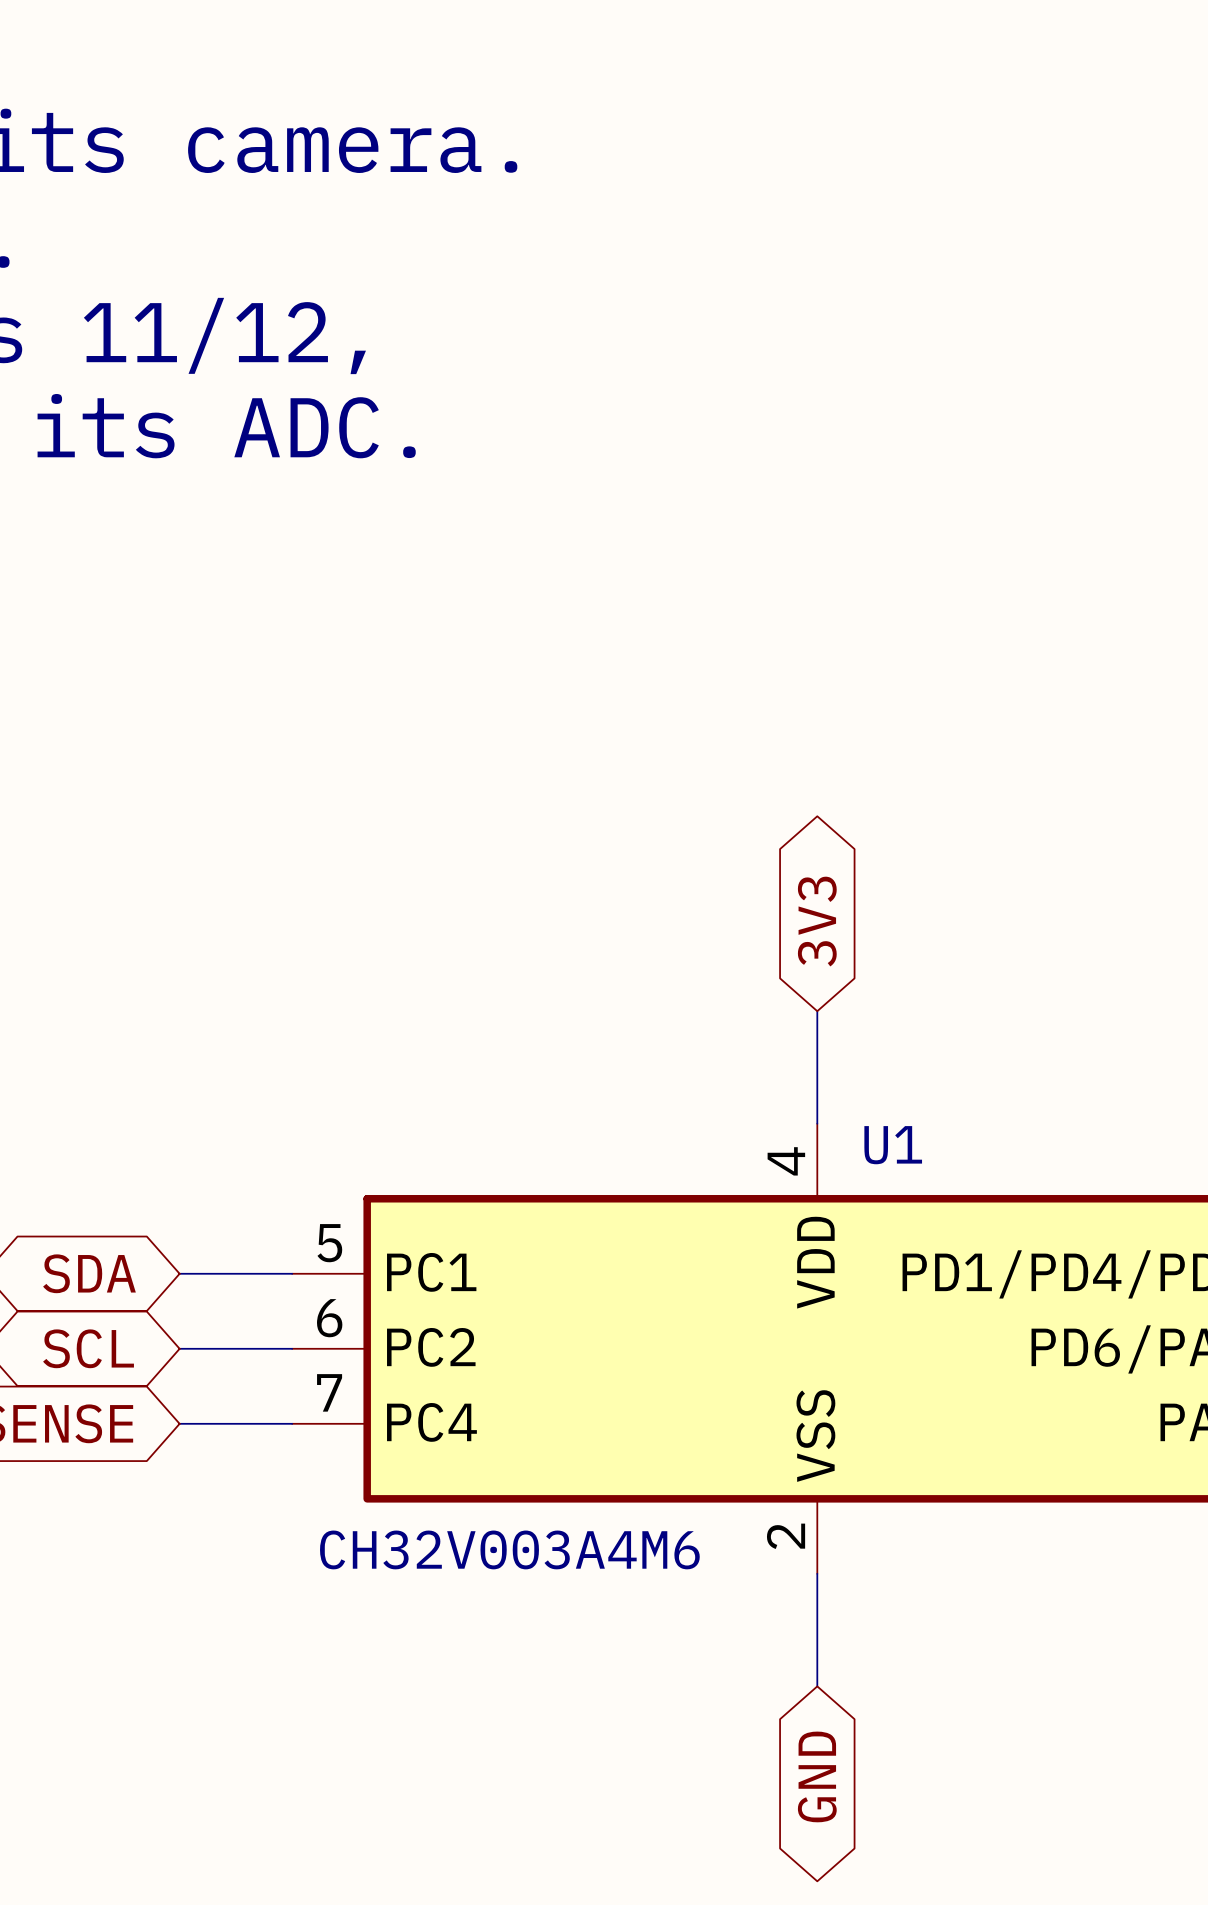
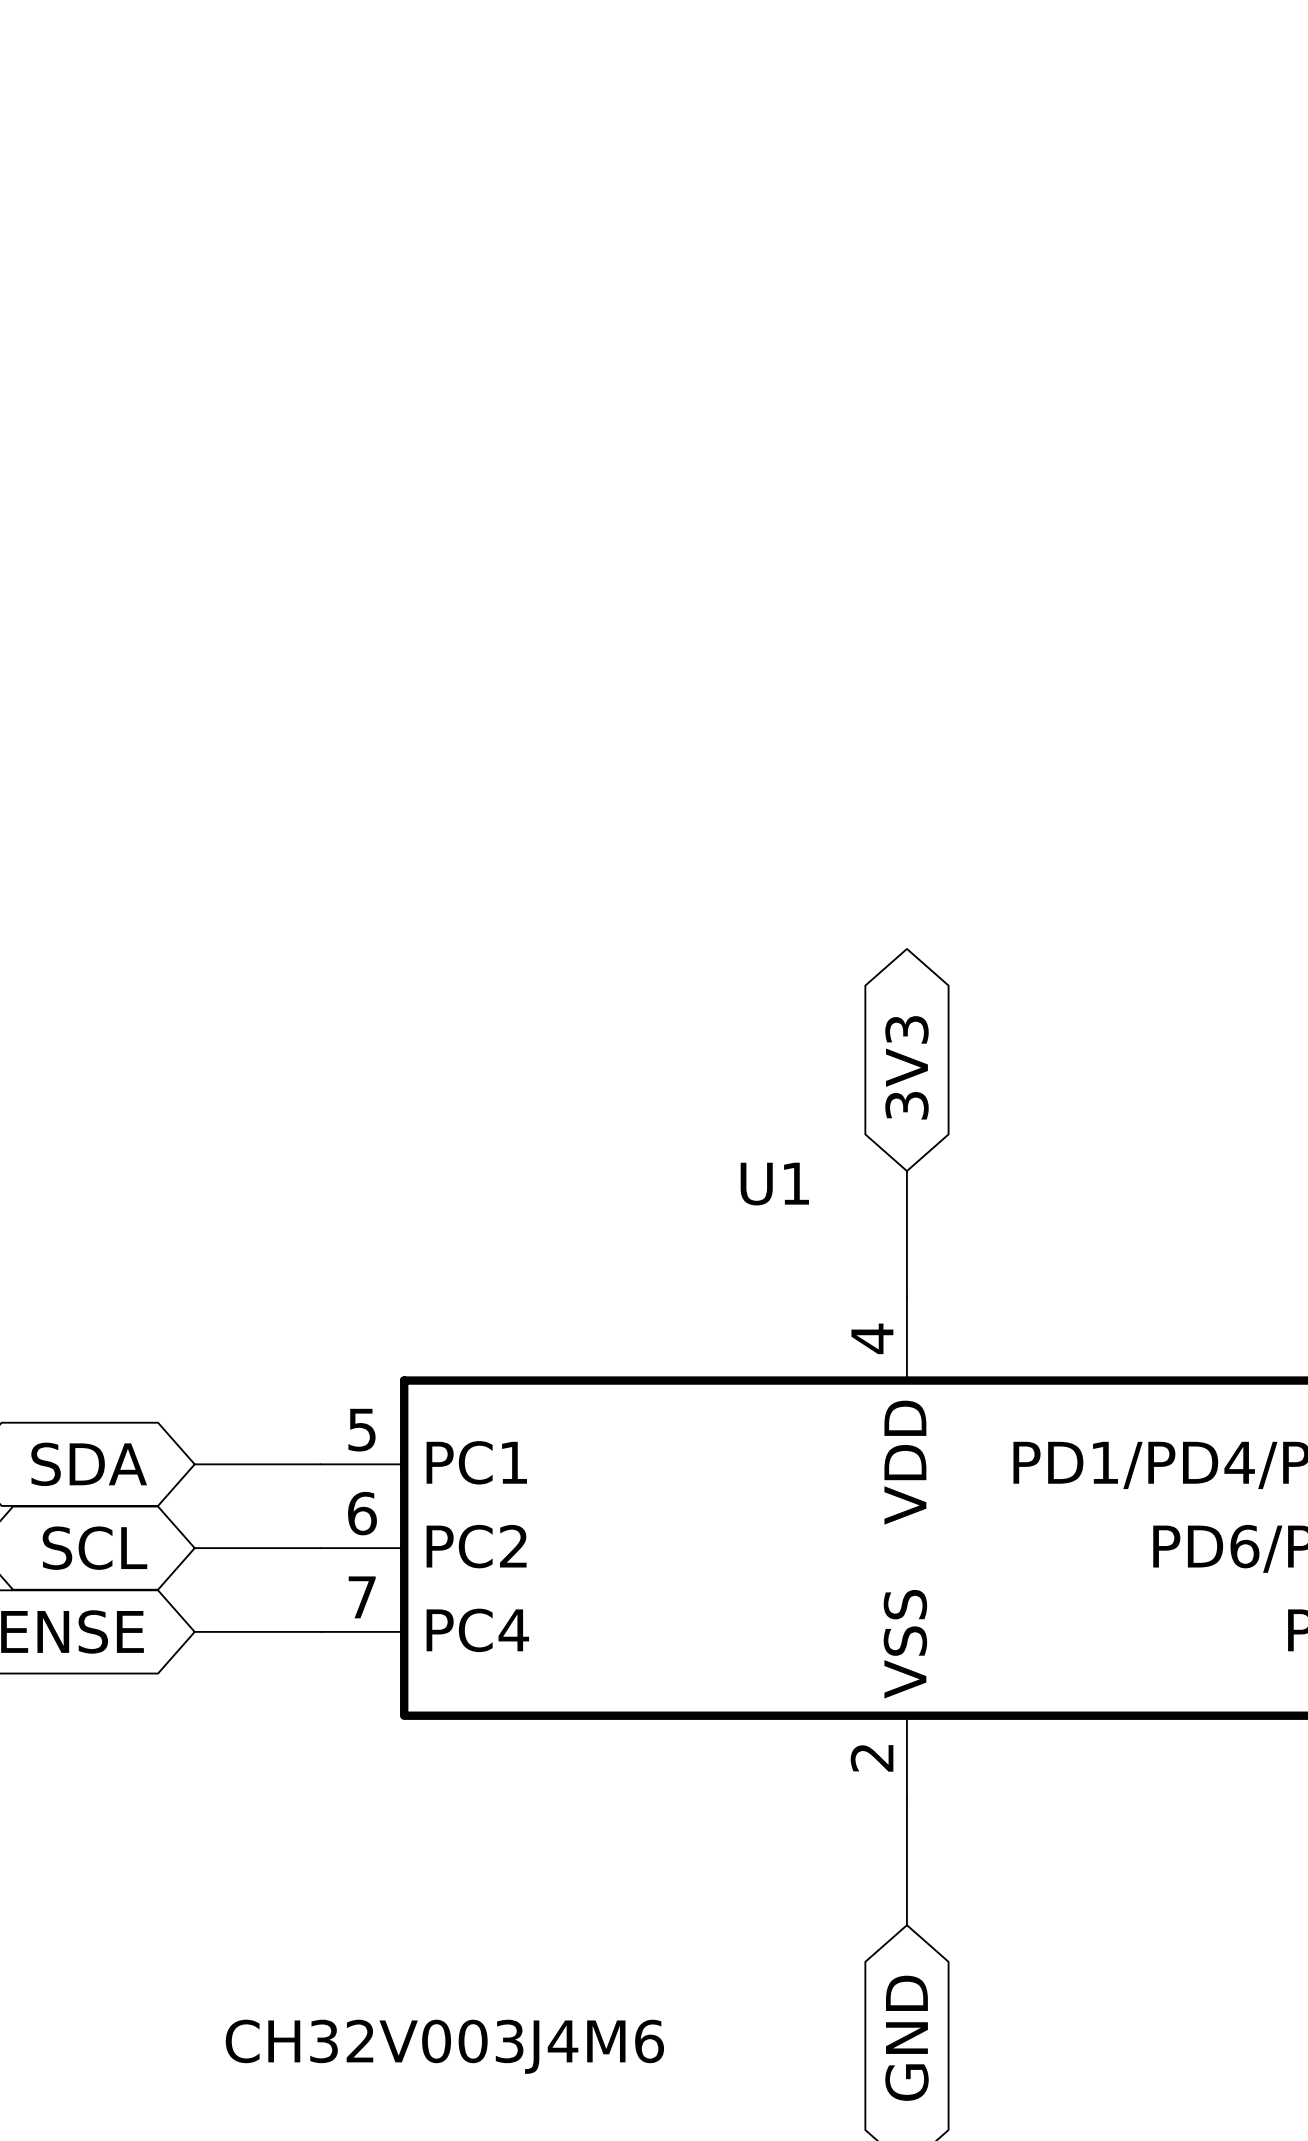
U1 name position: U1 (893, 1145) -> U1 (774, 1184)
U1 value: CH32V003A4M6 (509, 1549) -> CH32V003J4M6 (444, 2046)

